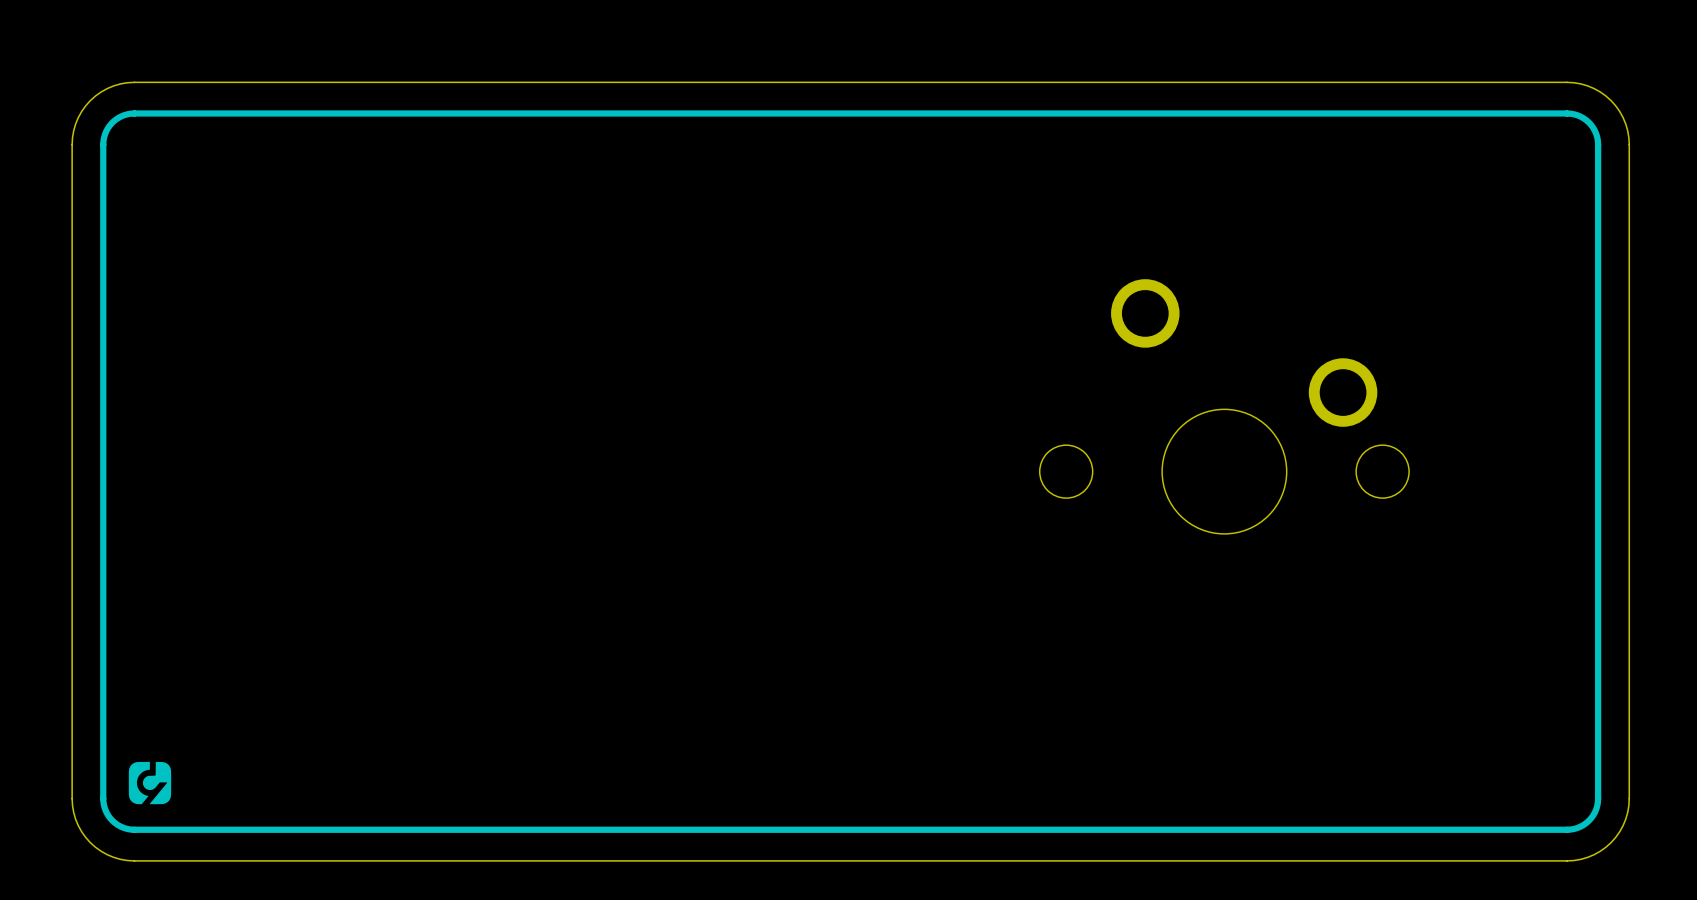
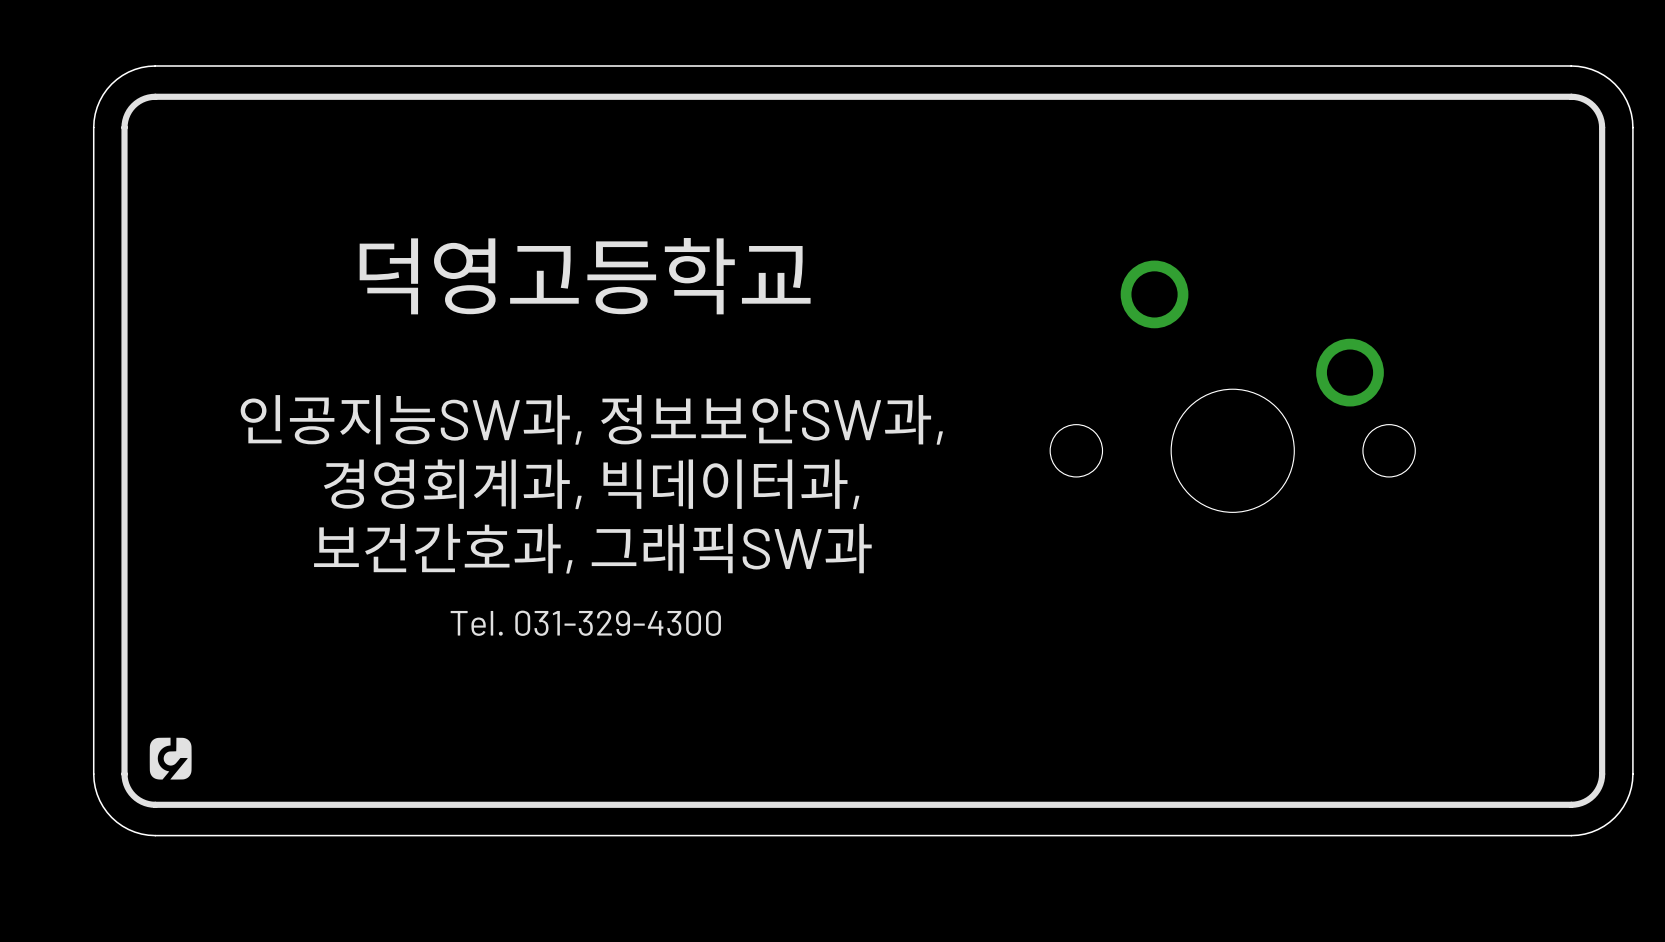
text: none -> 덕영고등학교 (585, 276)
text: none -> 인공지능SW과, 정보보안SW과, (591, 419)
text: none -> 경영회계과, 빅데이터과, (591, 484)
text: none -> 보건간호과, 그래픽SW과 (592, 548)
text: none -> Tel. 031-329-4300 (585, 623)

